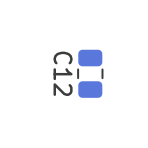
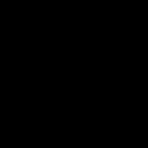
C12: (90, 73) -> none

